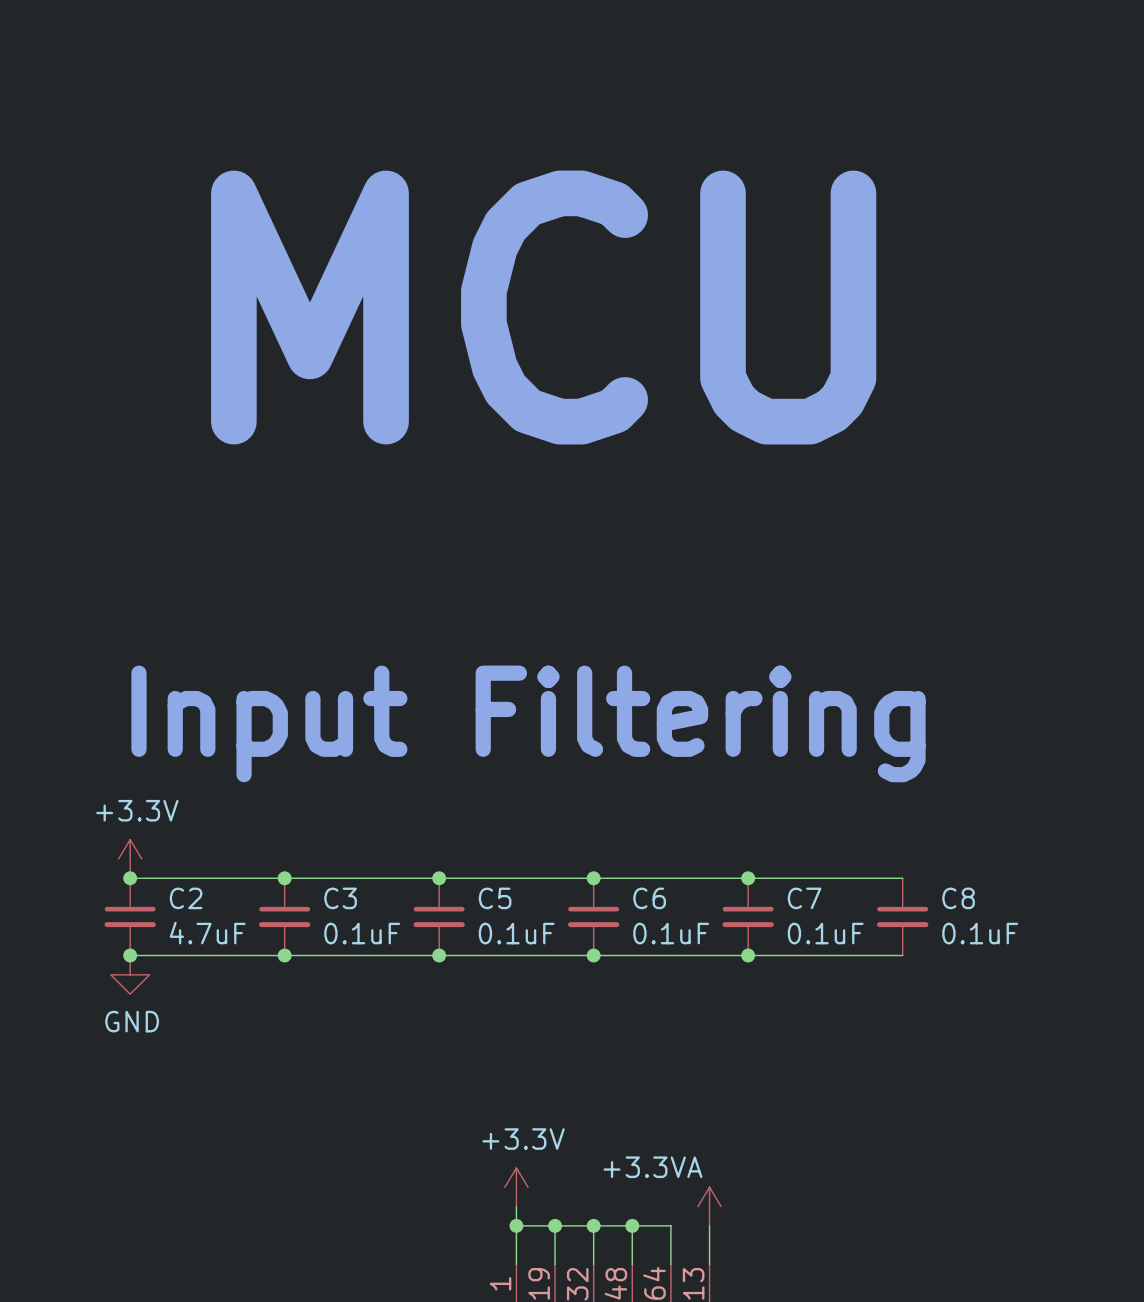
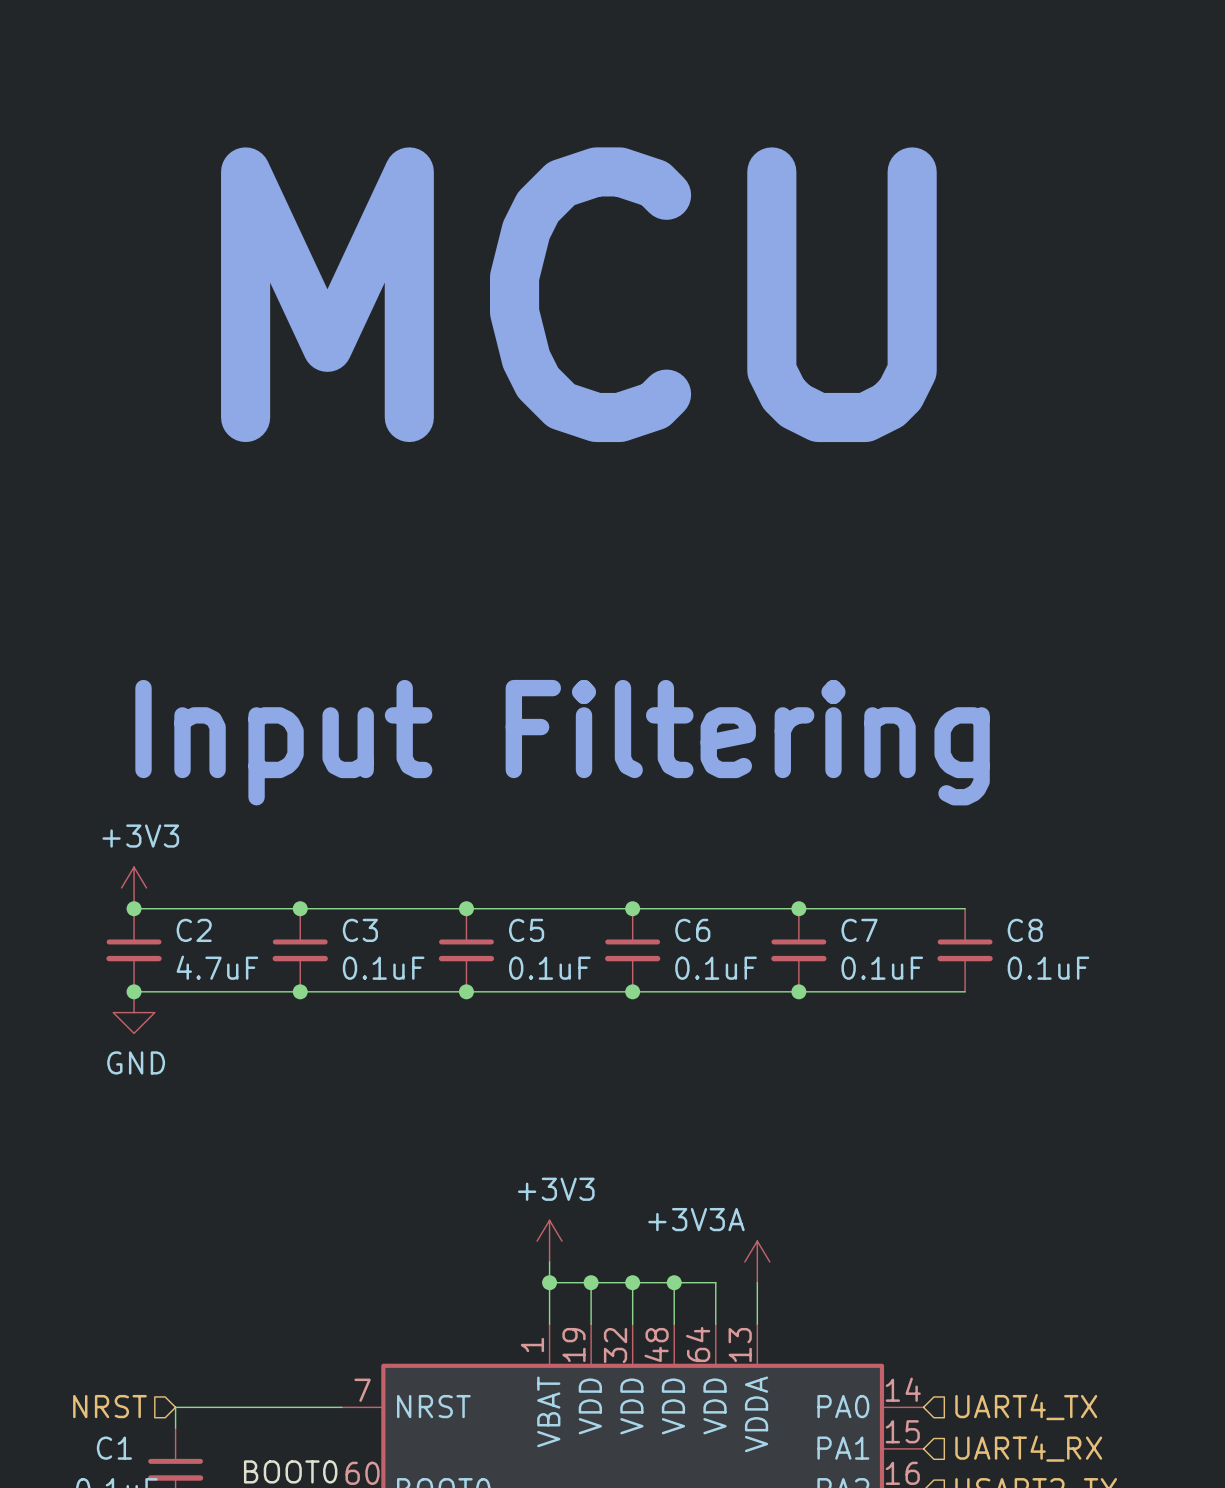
power symbol: +3.3V (130, 858) -> +3V3 (134, 887)
power symbol: +3.3V (516, 1187) -> +3V3 (549, 1241)
power symbol: +3.3VA (709, 1206) -> +3V3A (757, 1261)

